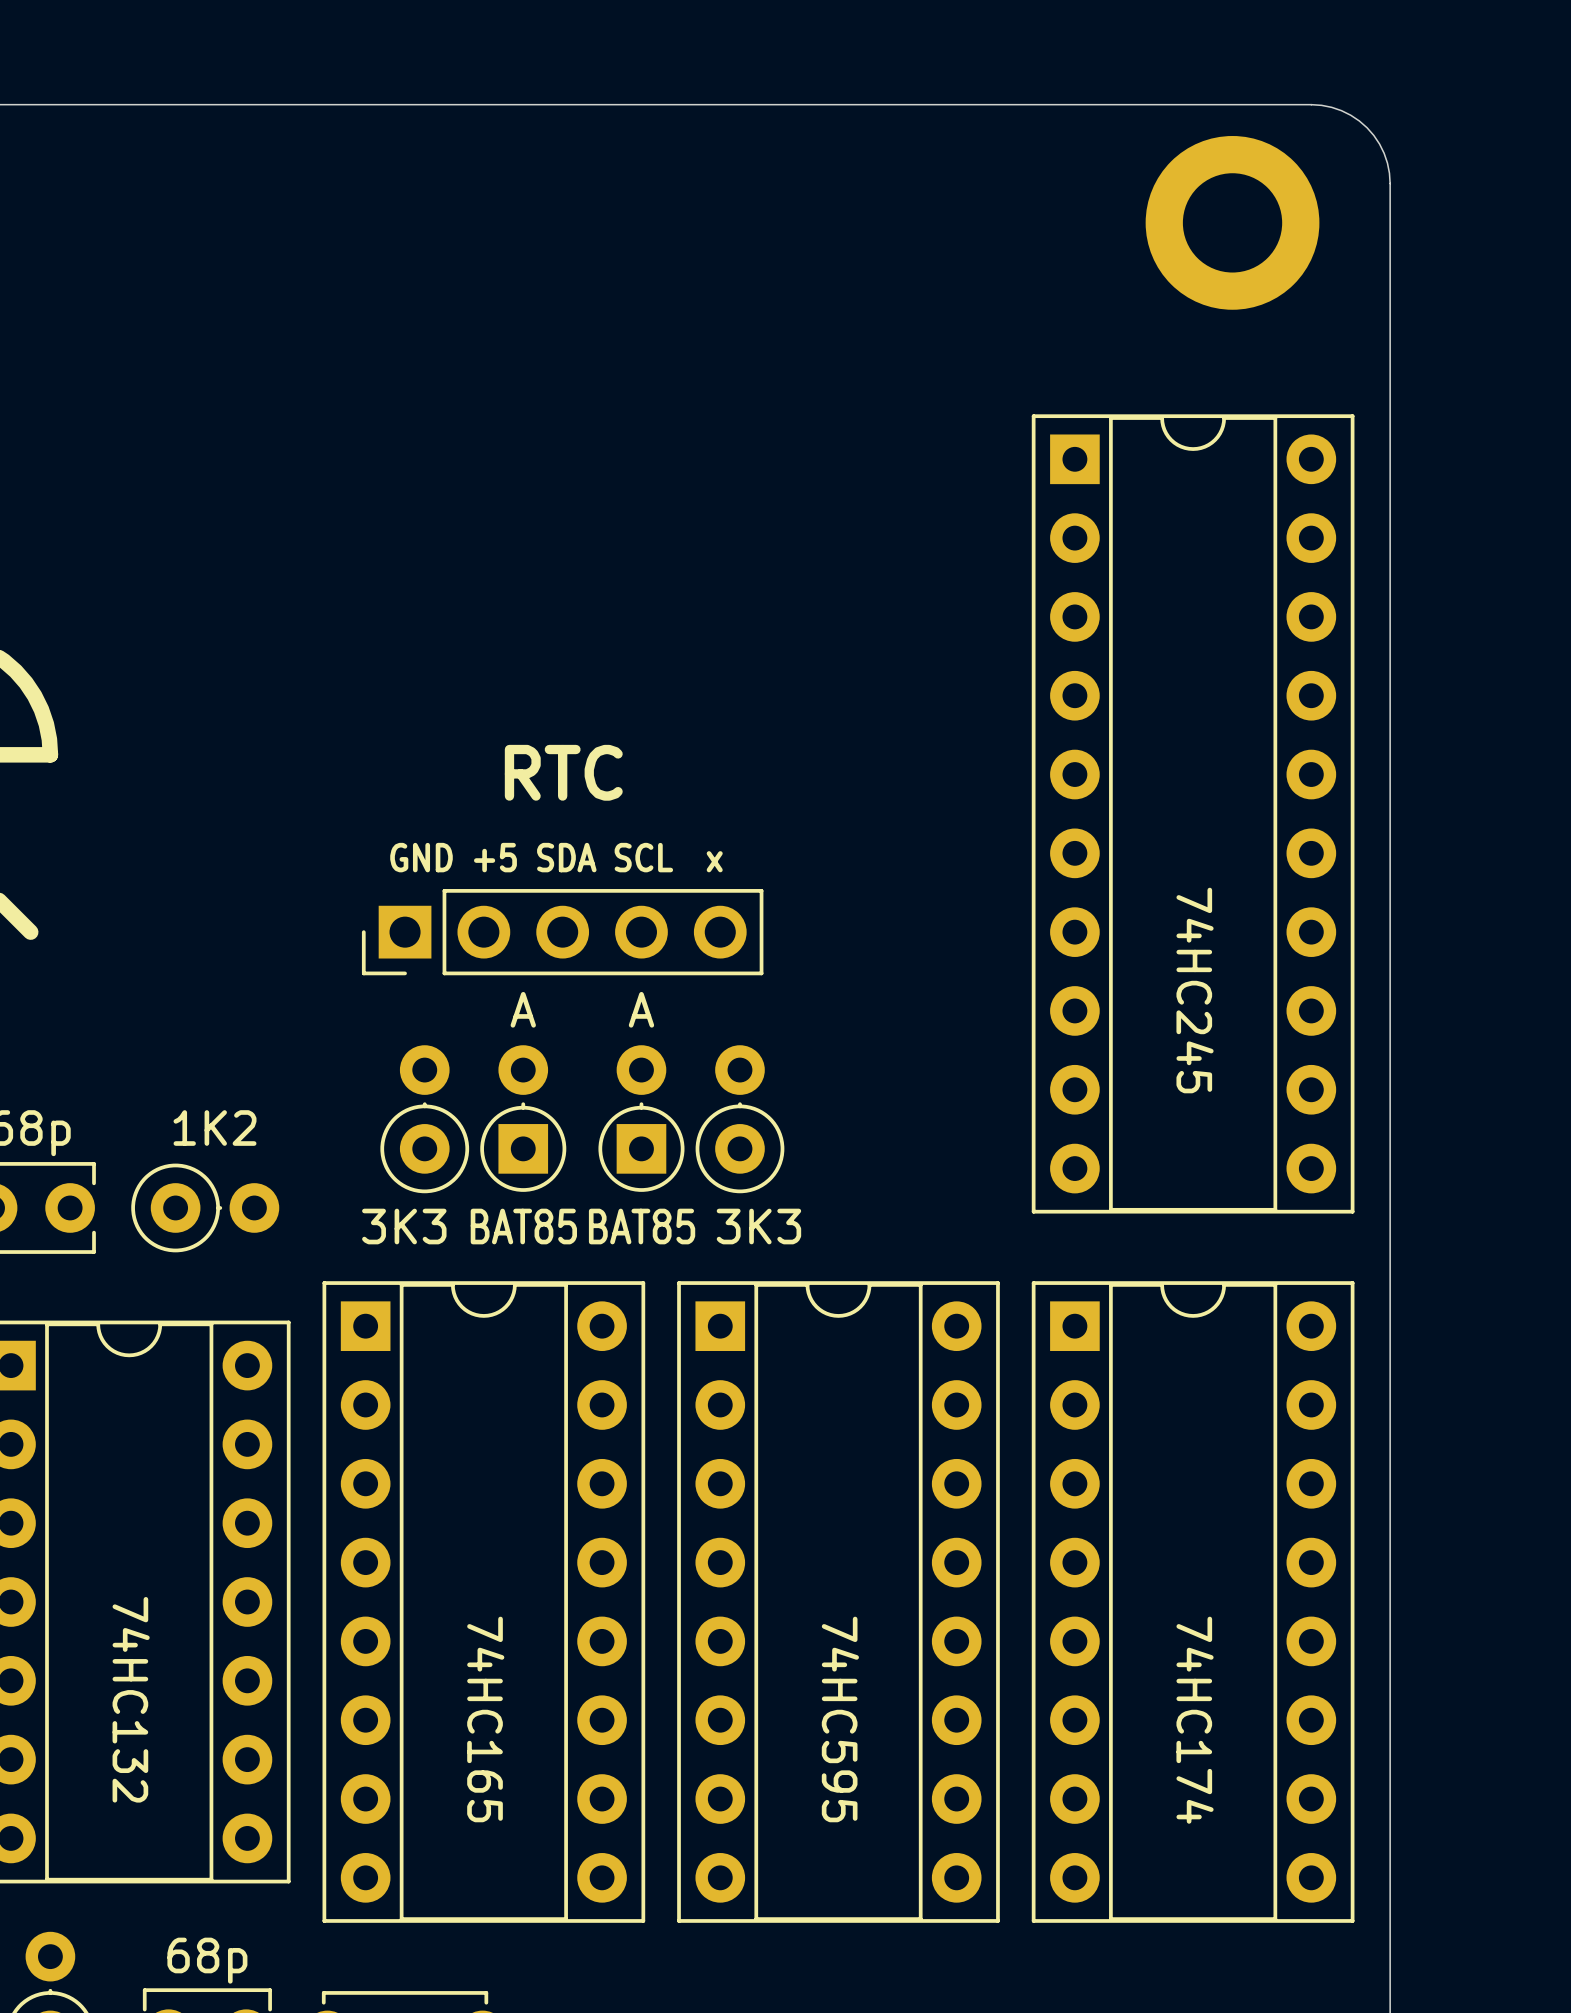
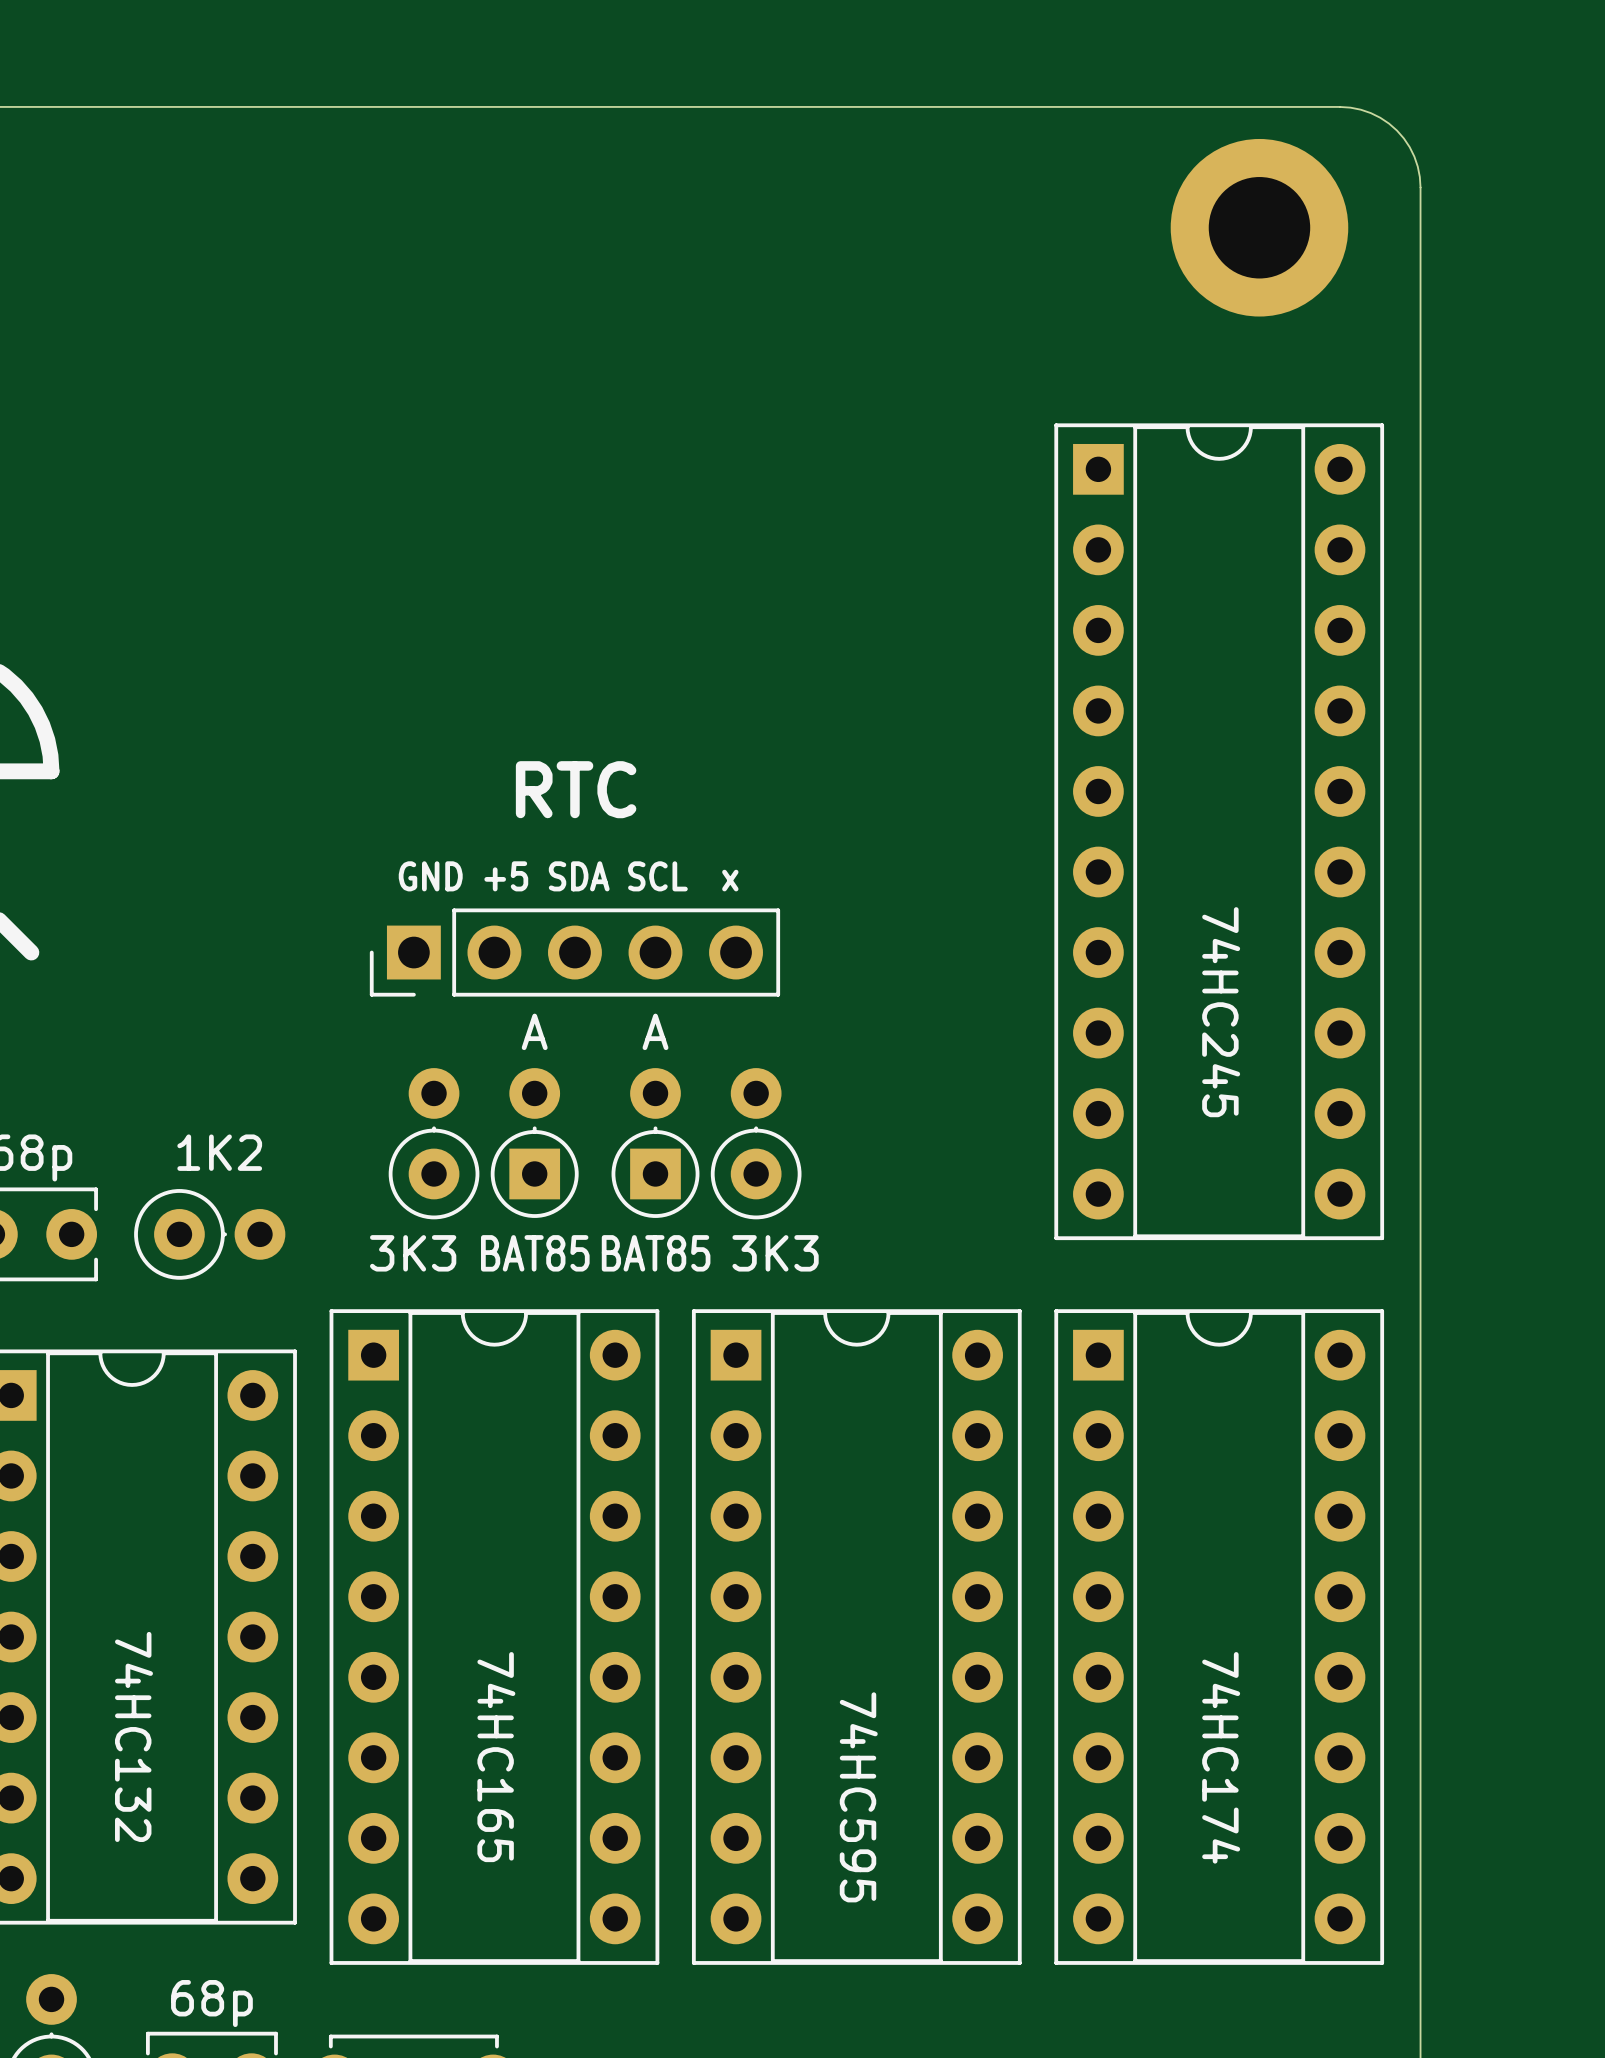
part value position: 74HC595 (840, 1719) -> 74HC595 (858, 1797)

